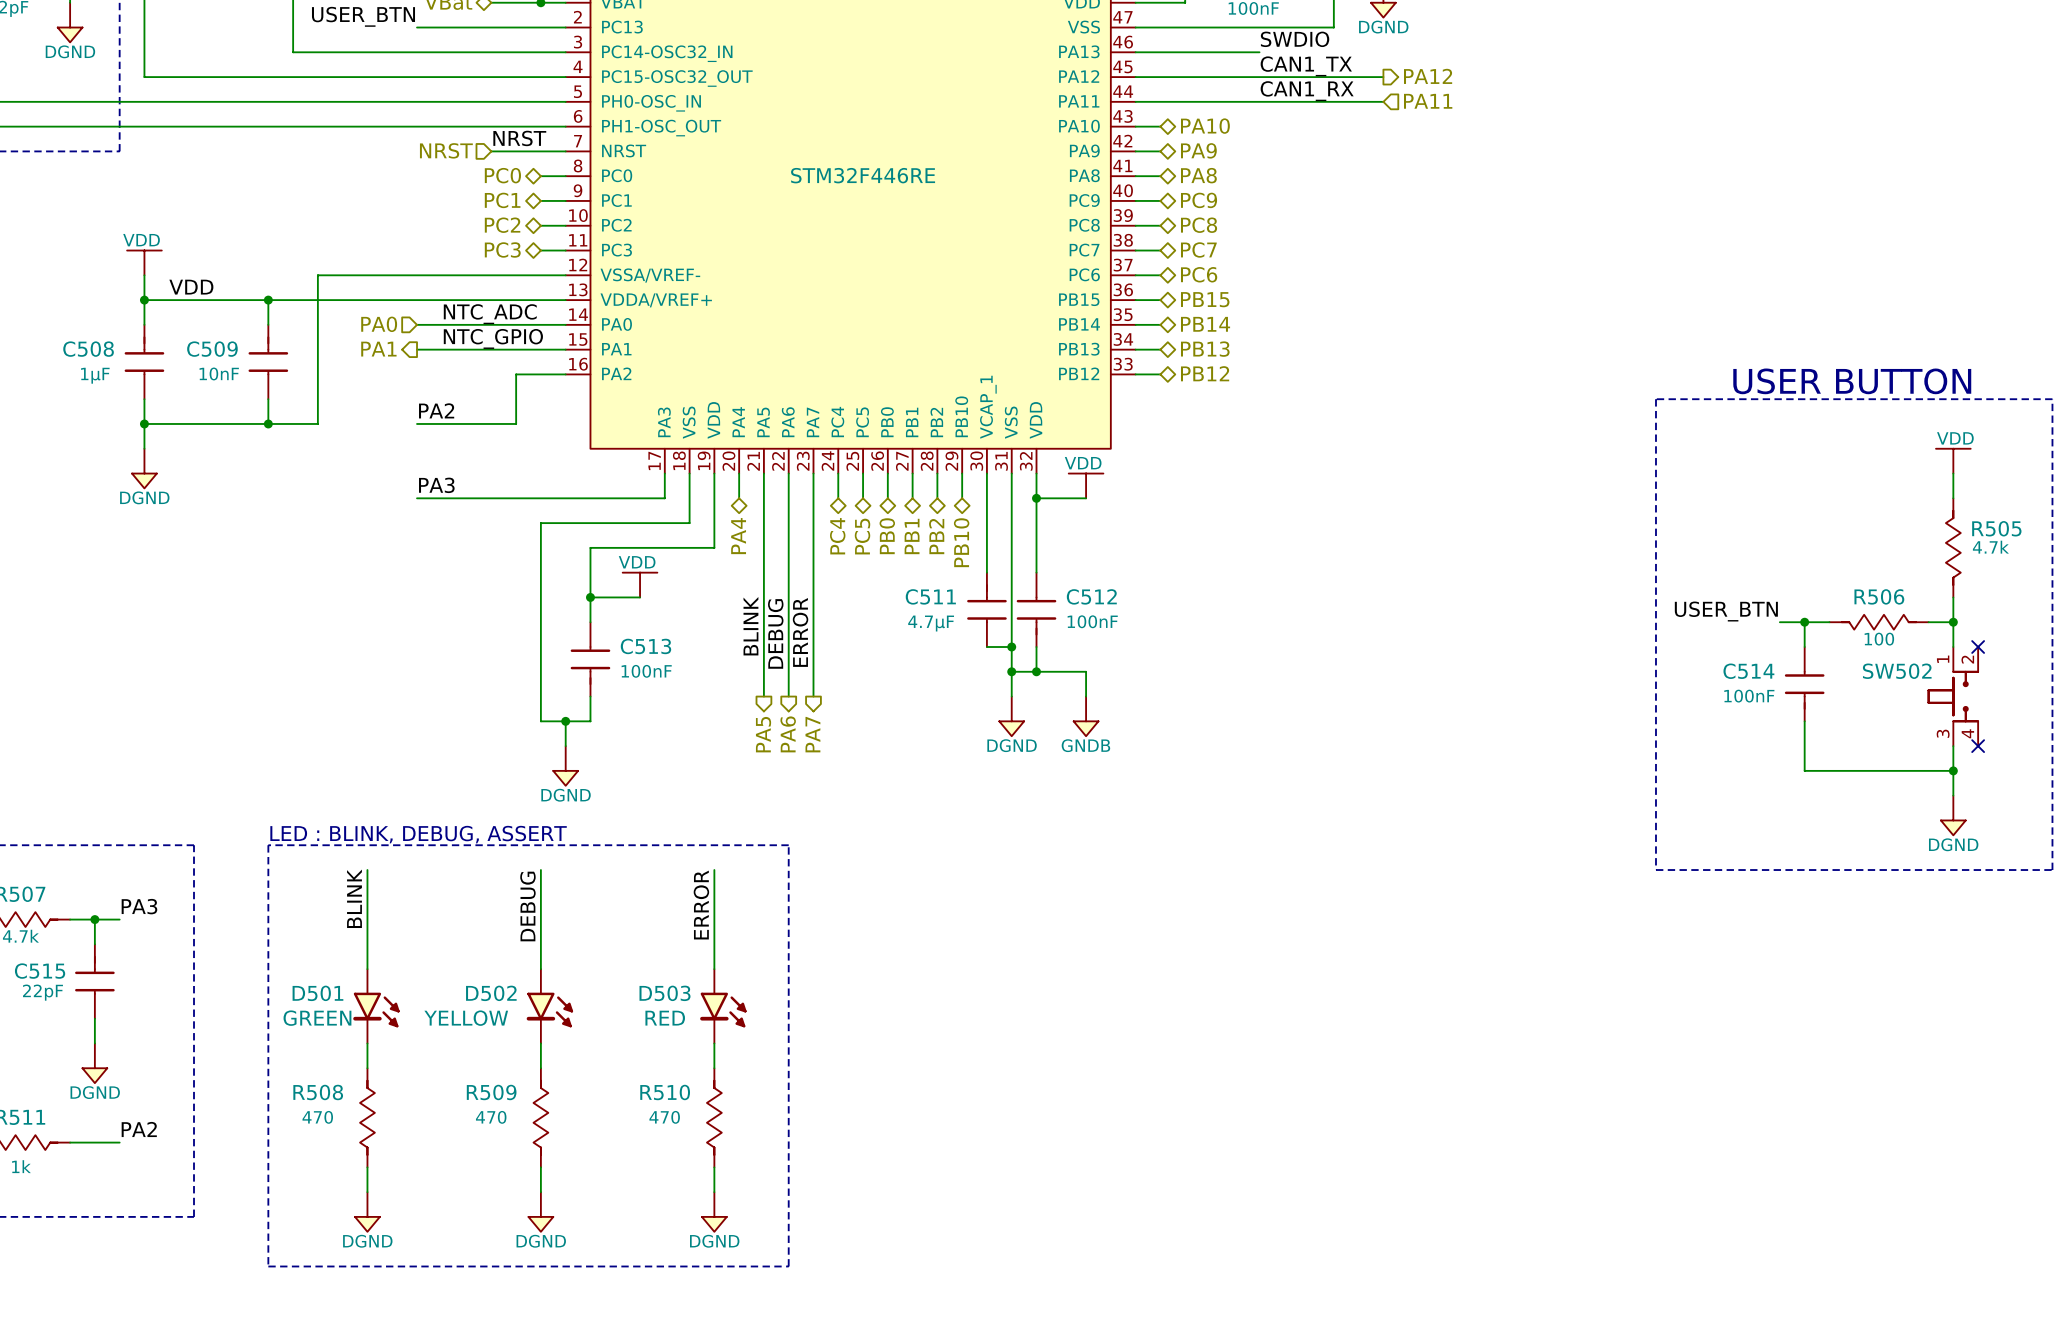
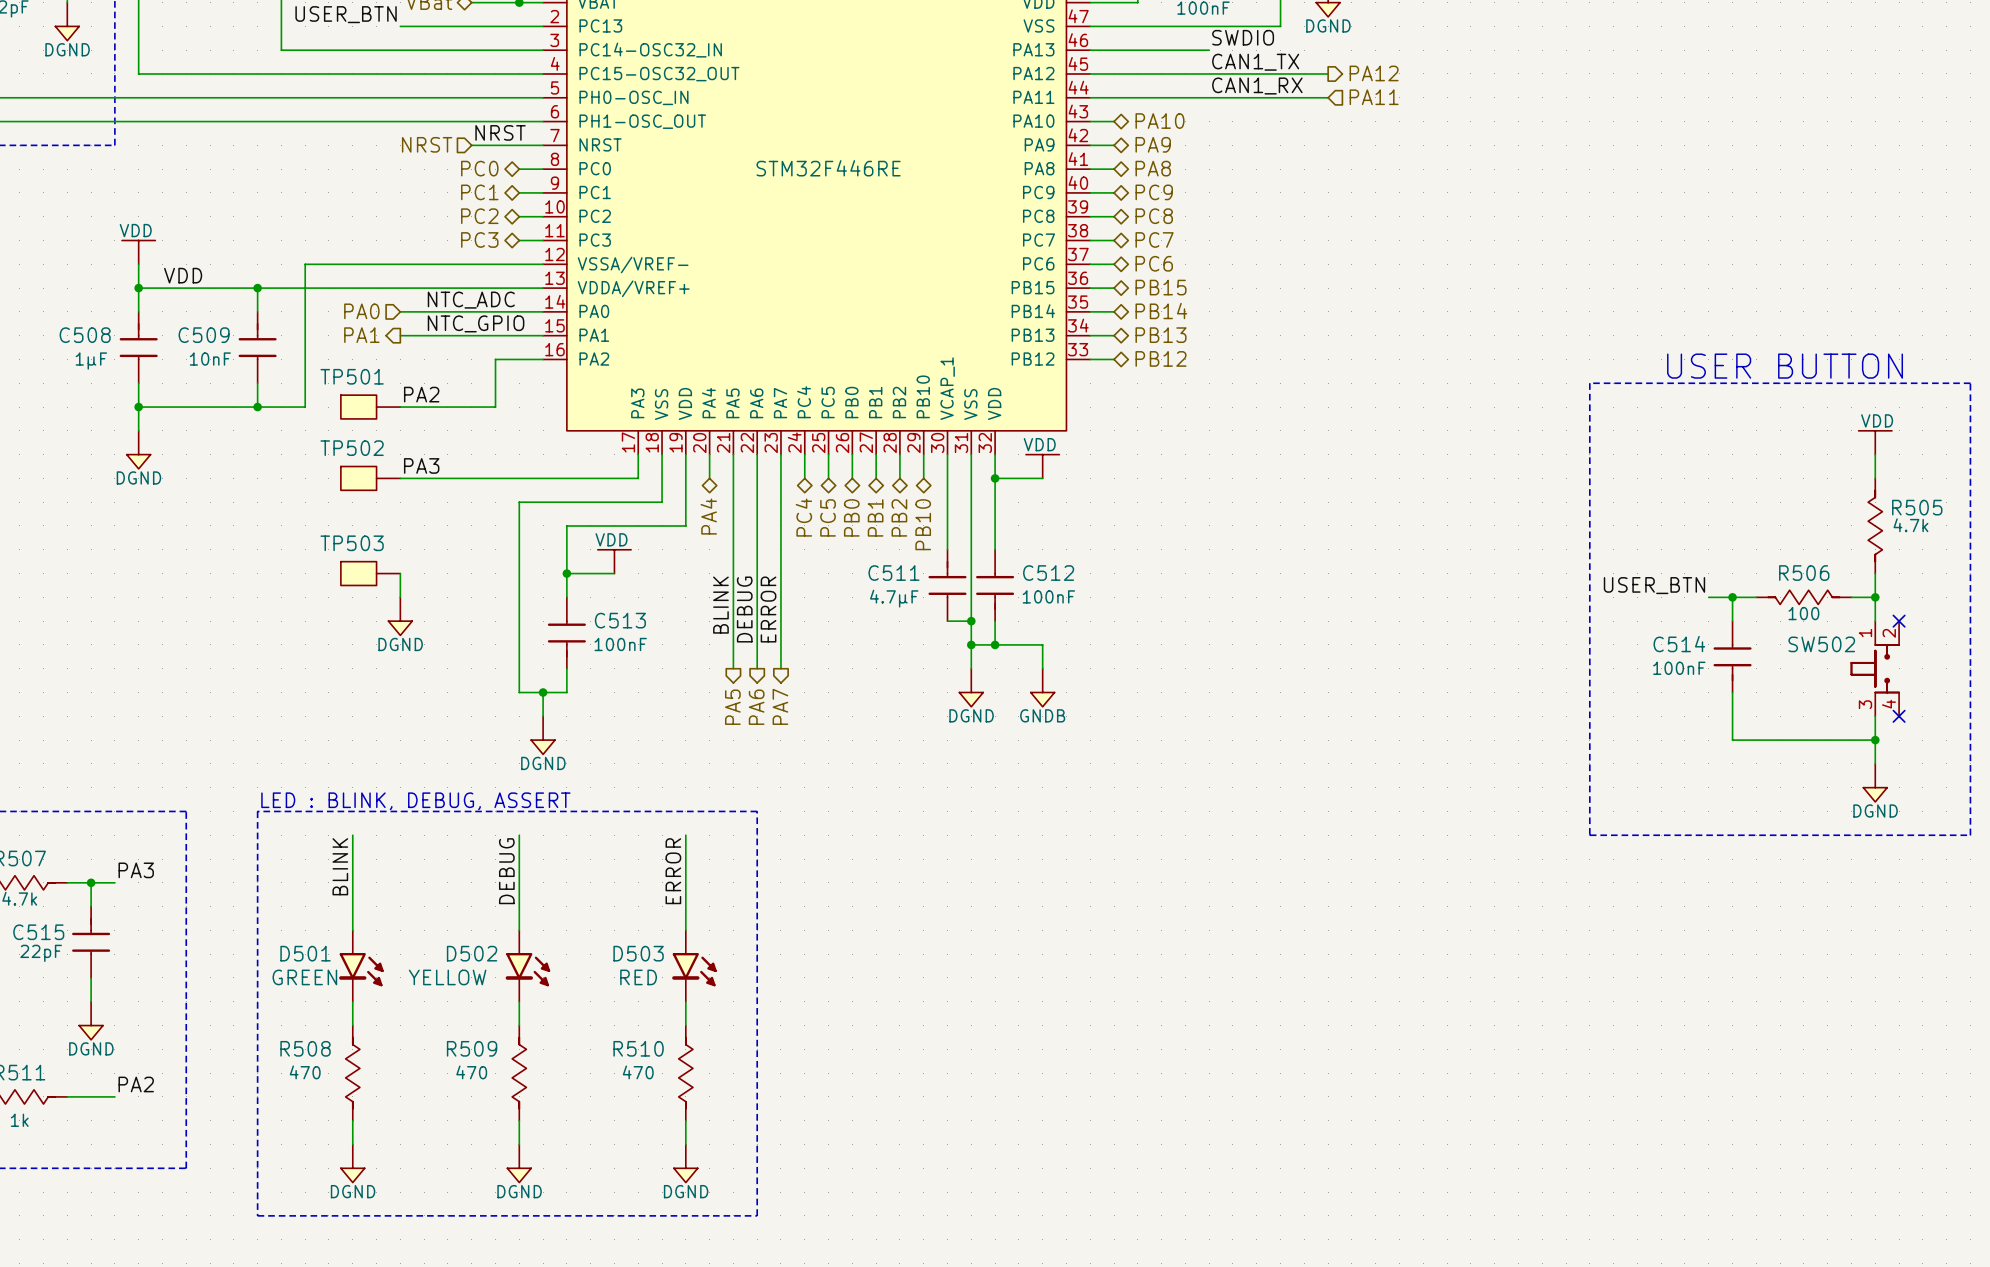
TP501: none -> (370, 407)
TP502: none -> (370, 478)
TP503: none -> (370, 573)
wire: none -> (400, 573) (400, 597)
power symbol: none -> DGND (400, 616)

